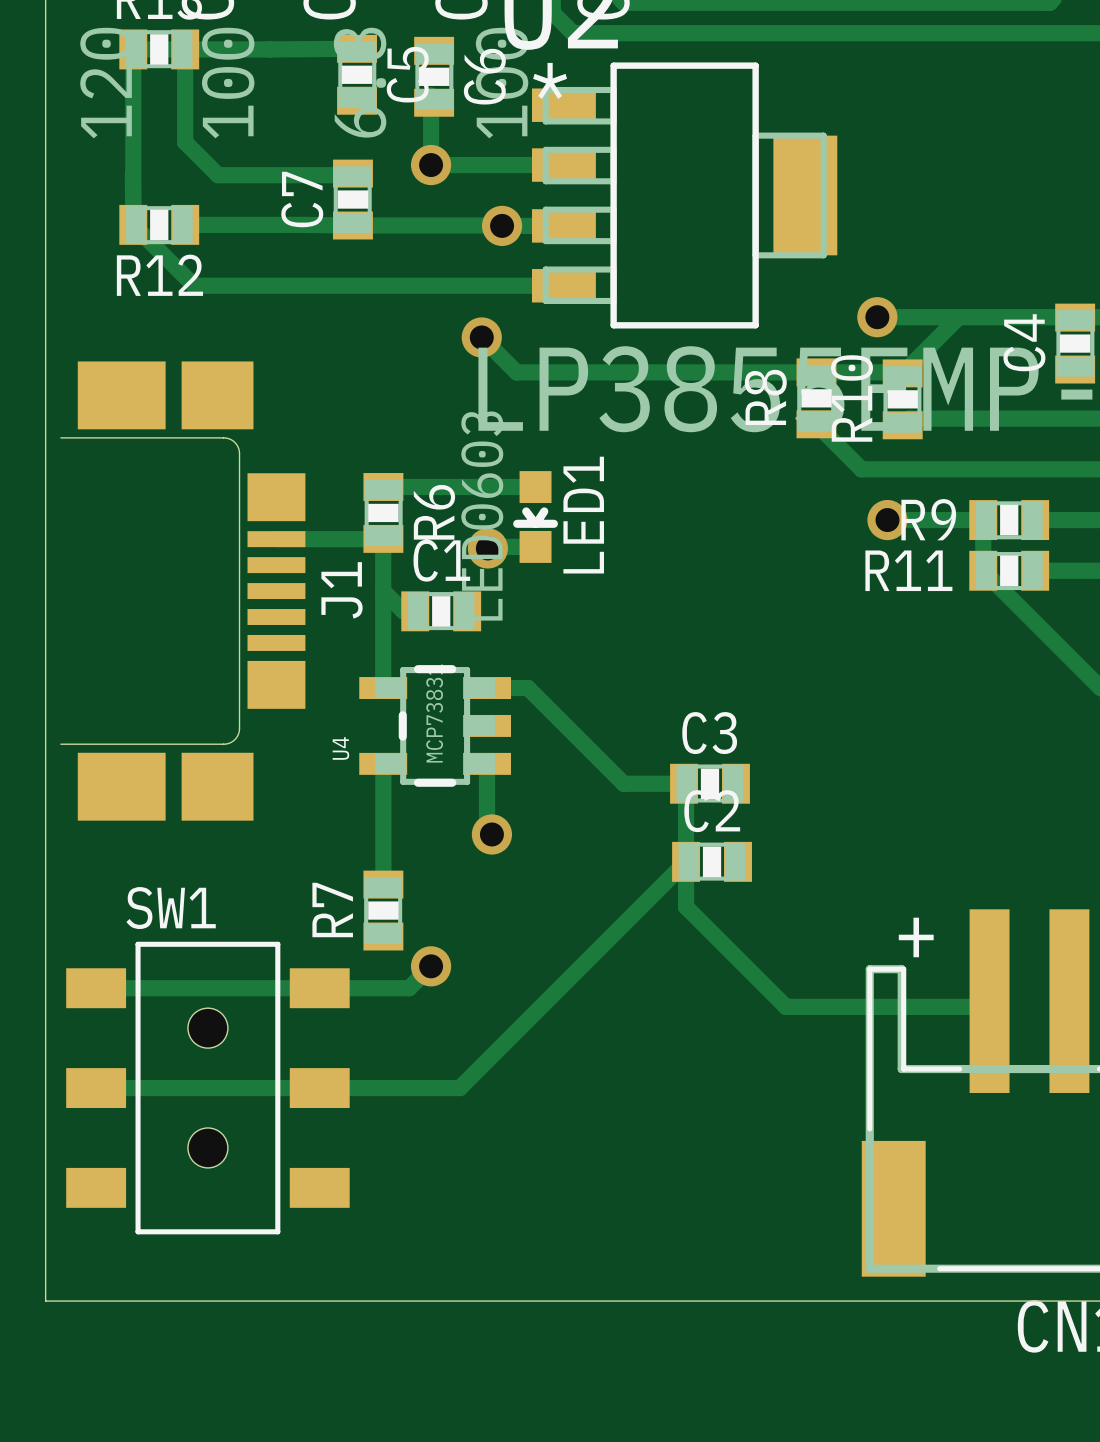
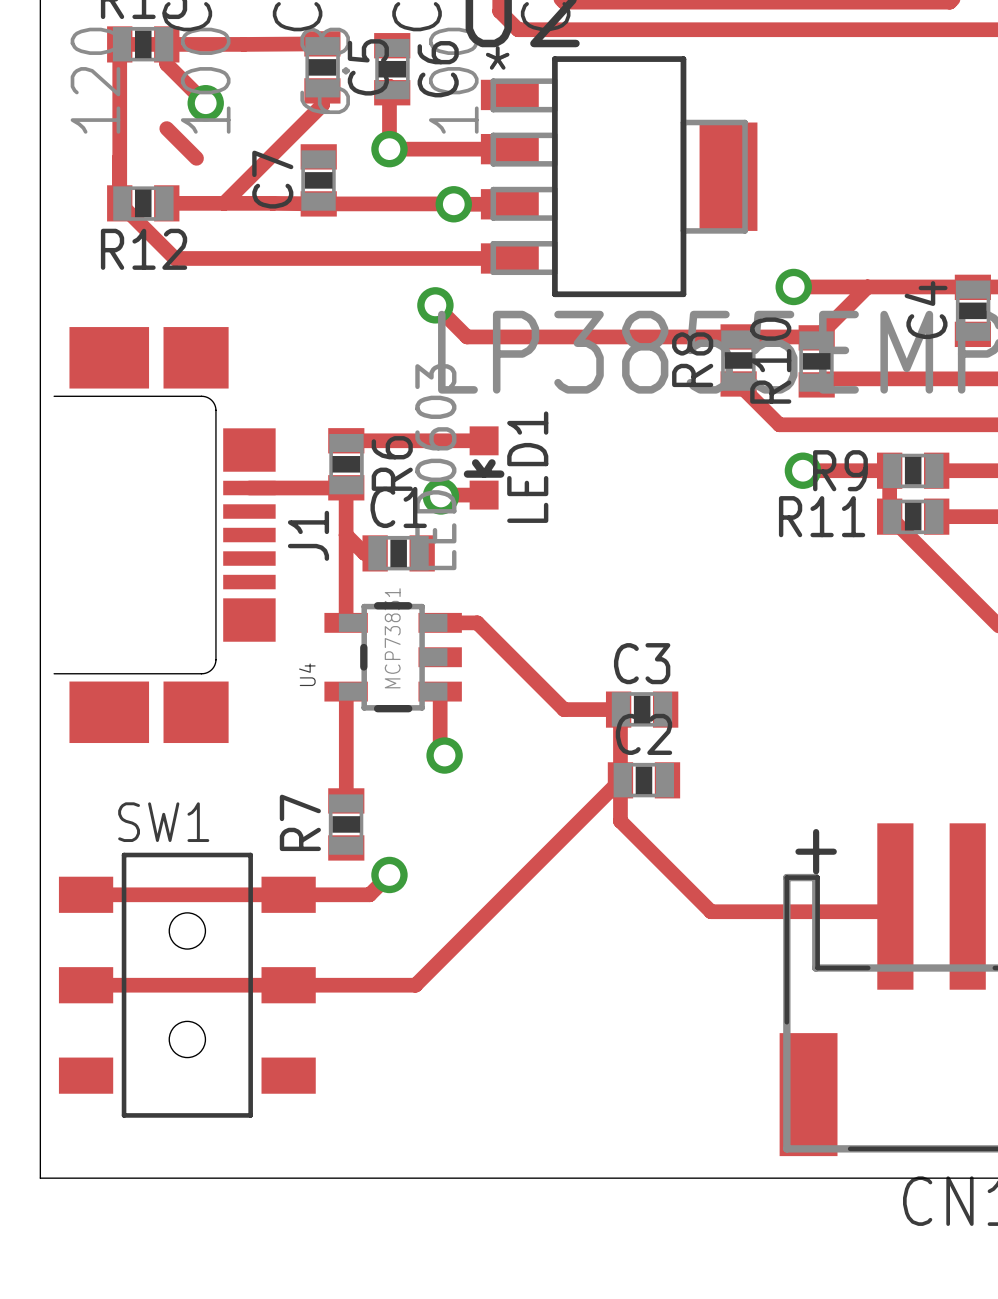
track: (185, 71) (185, 142) -> (166, 64) (205, 103)
track: none -> (322, 90) (322, 105) (224, 203)
via: none -> (205, 103)
track: (218, 175) (351, 175) -> none

